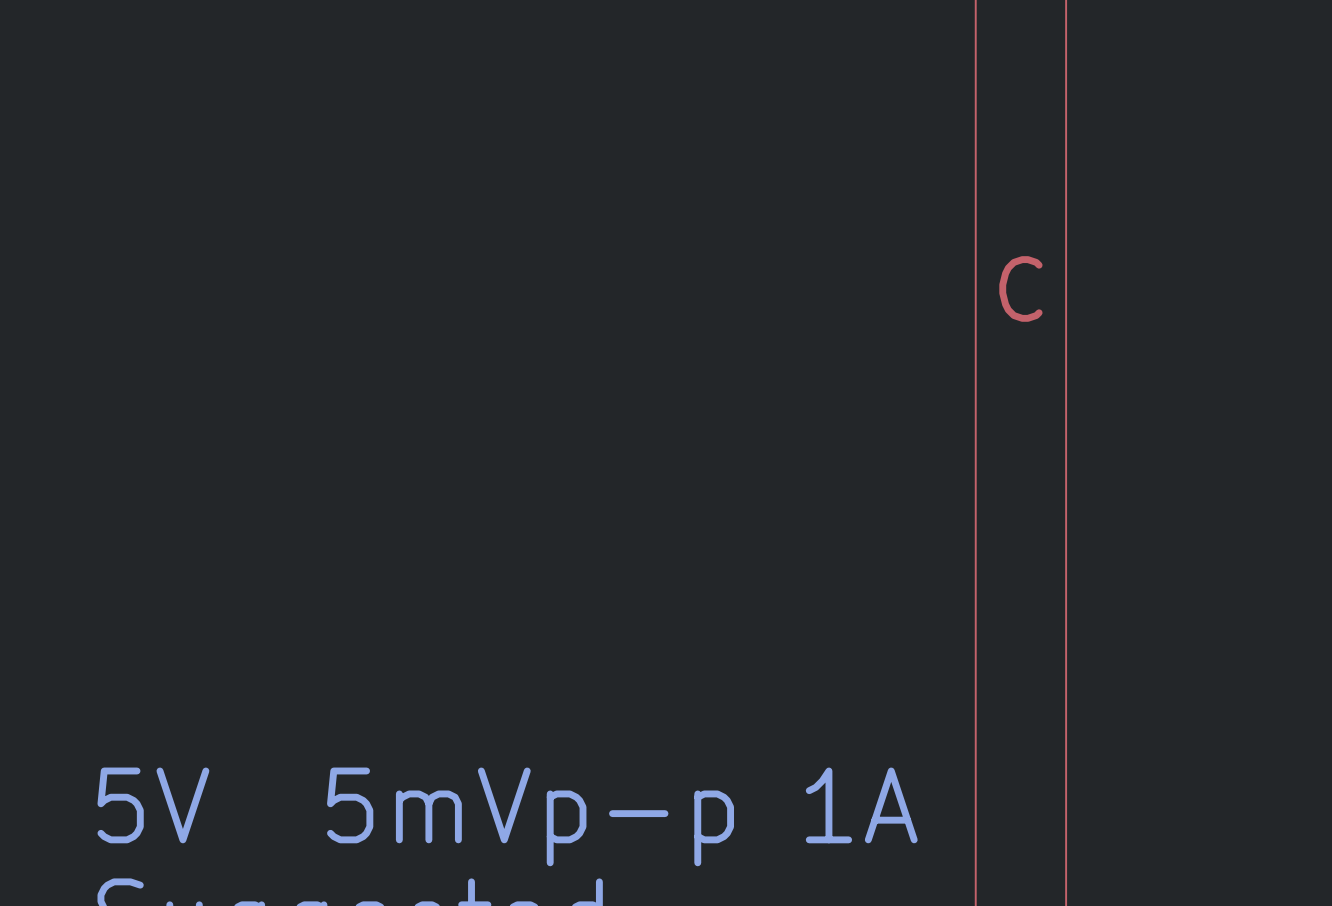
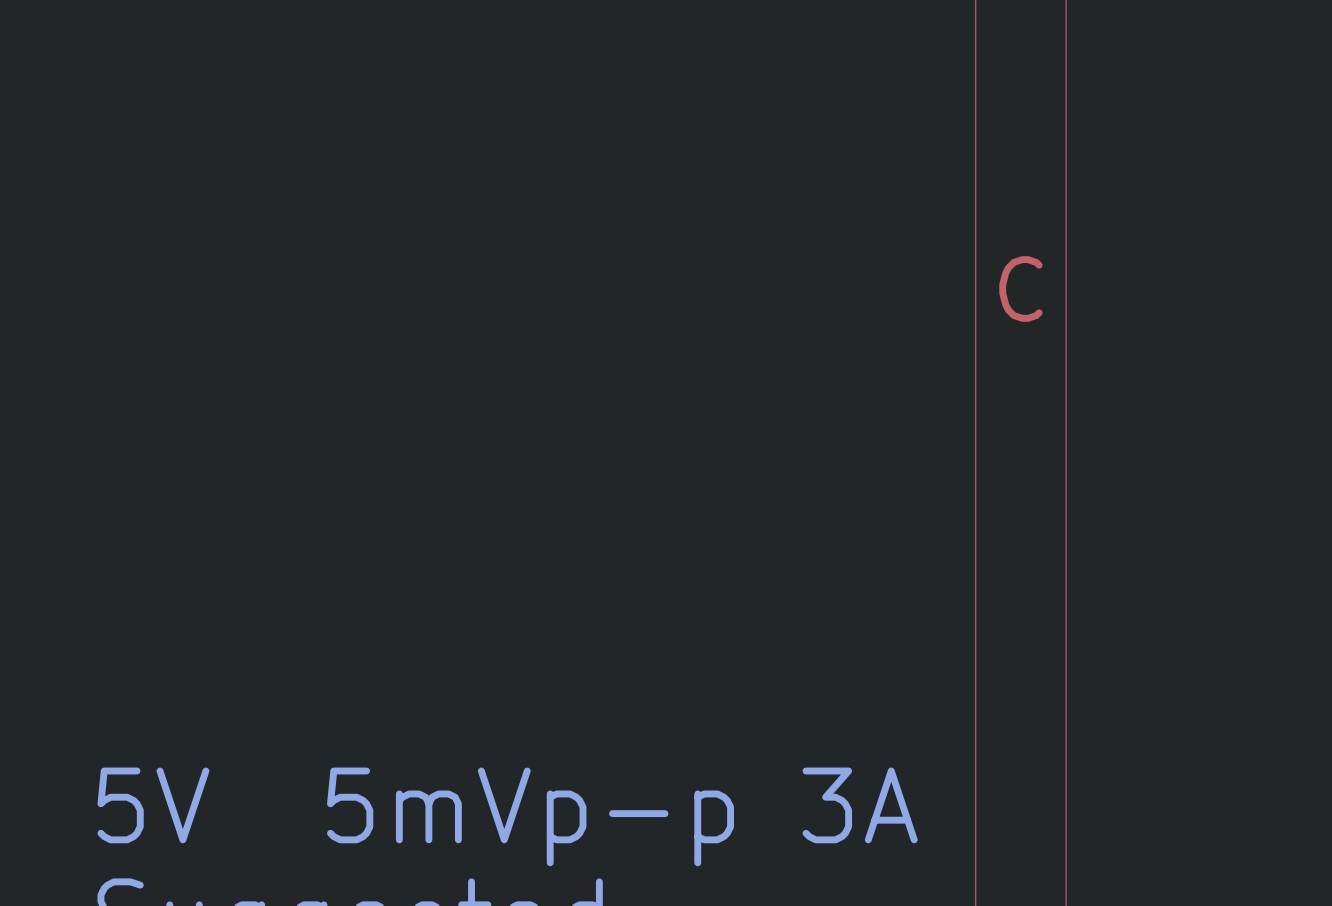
text: 5V 5mVp-p 1A (507, 816) -> 5V 5mVp-p 3A (507, 816)

